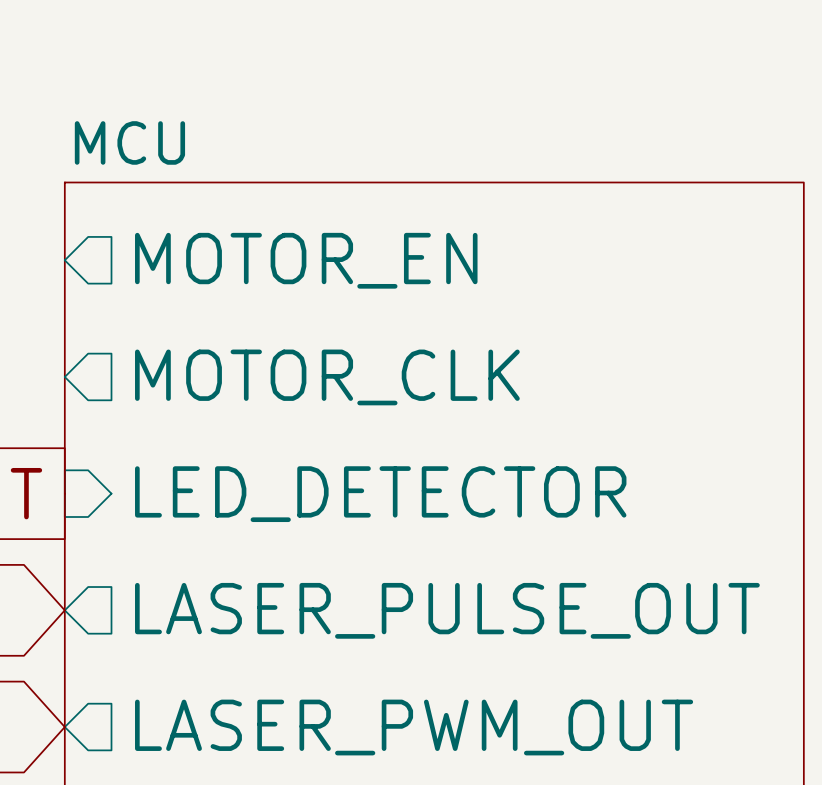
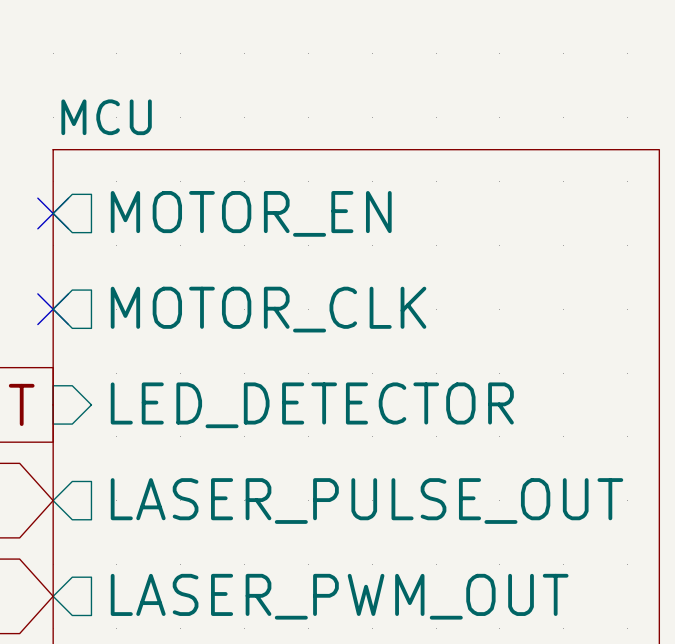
no-connect mark: none -> (53, 213)
no-connect mark: none -> (53, 309)

